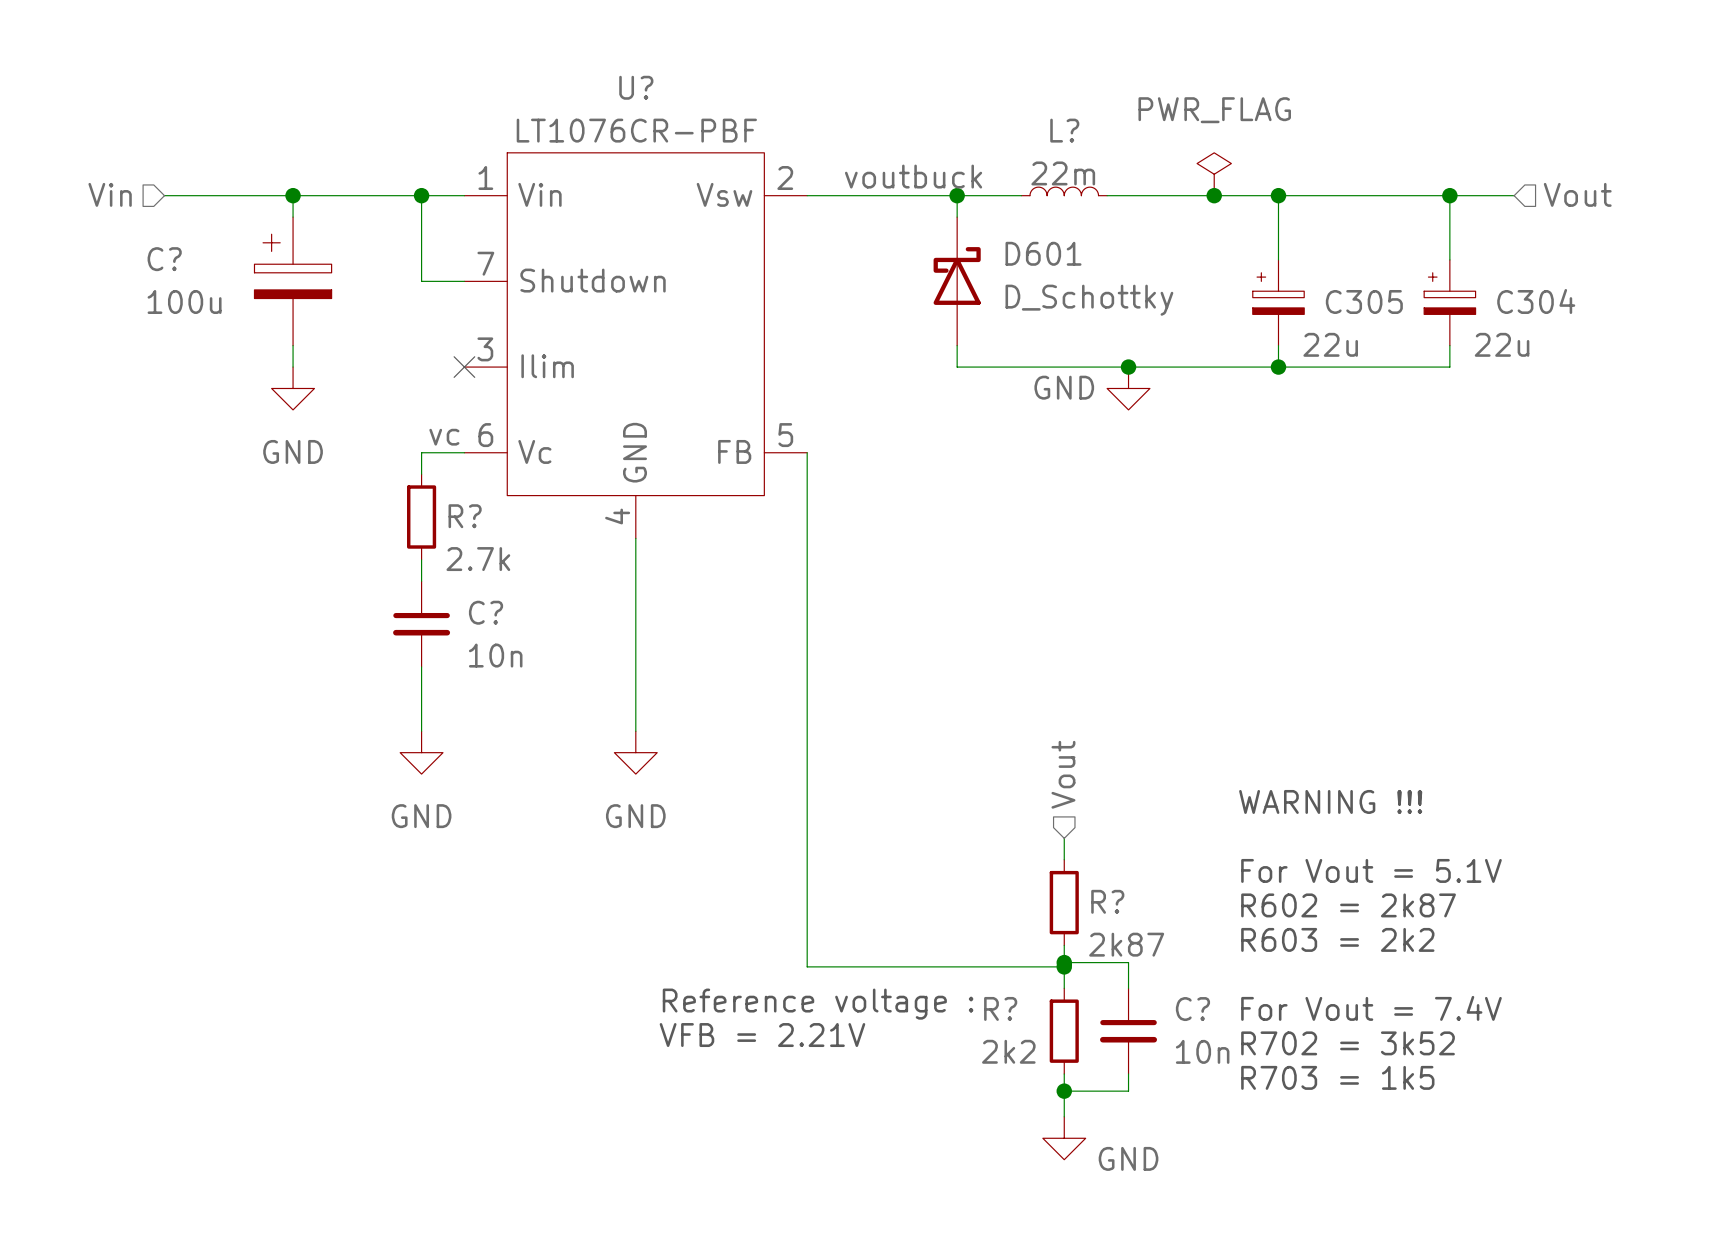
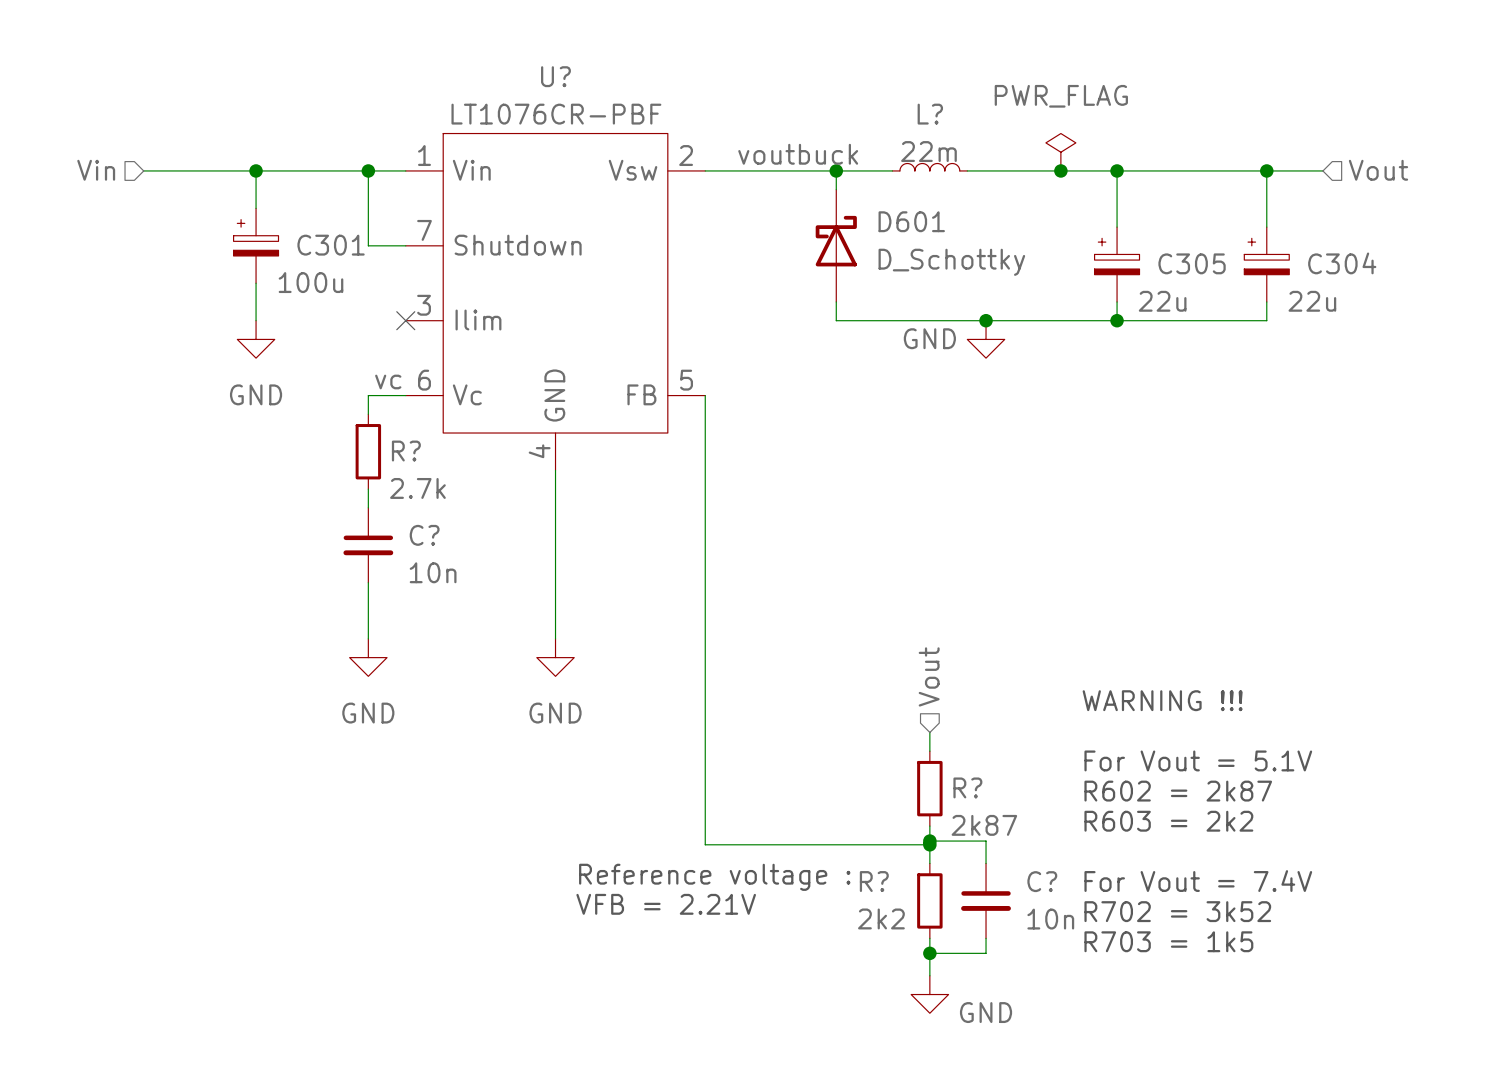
C?: 100u (293, 281) -> none
C301: none -> 100u (256, 245)

